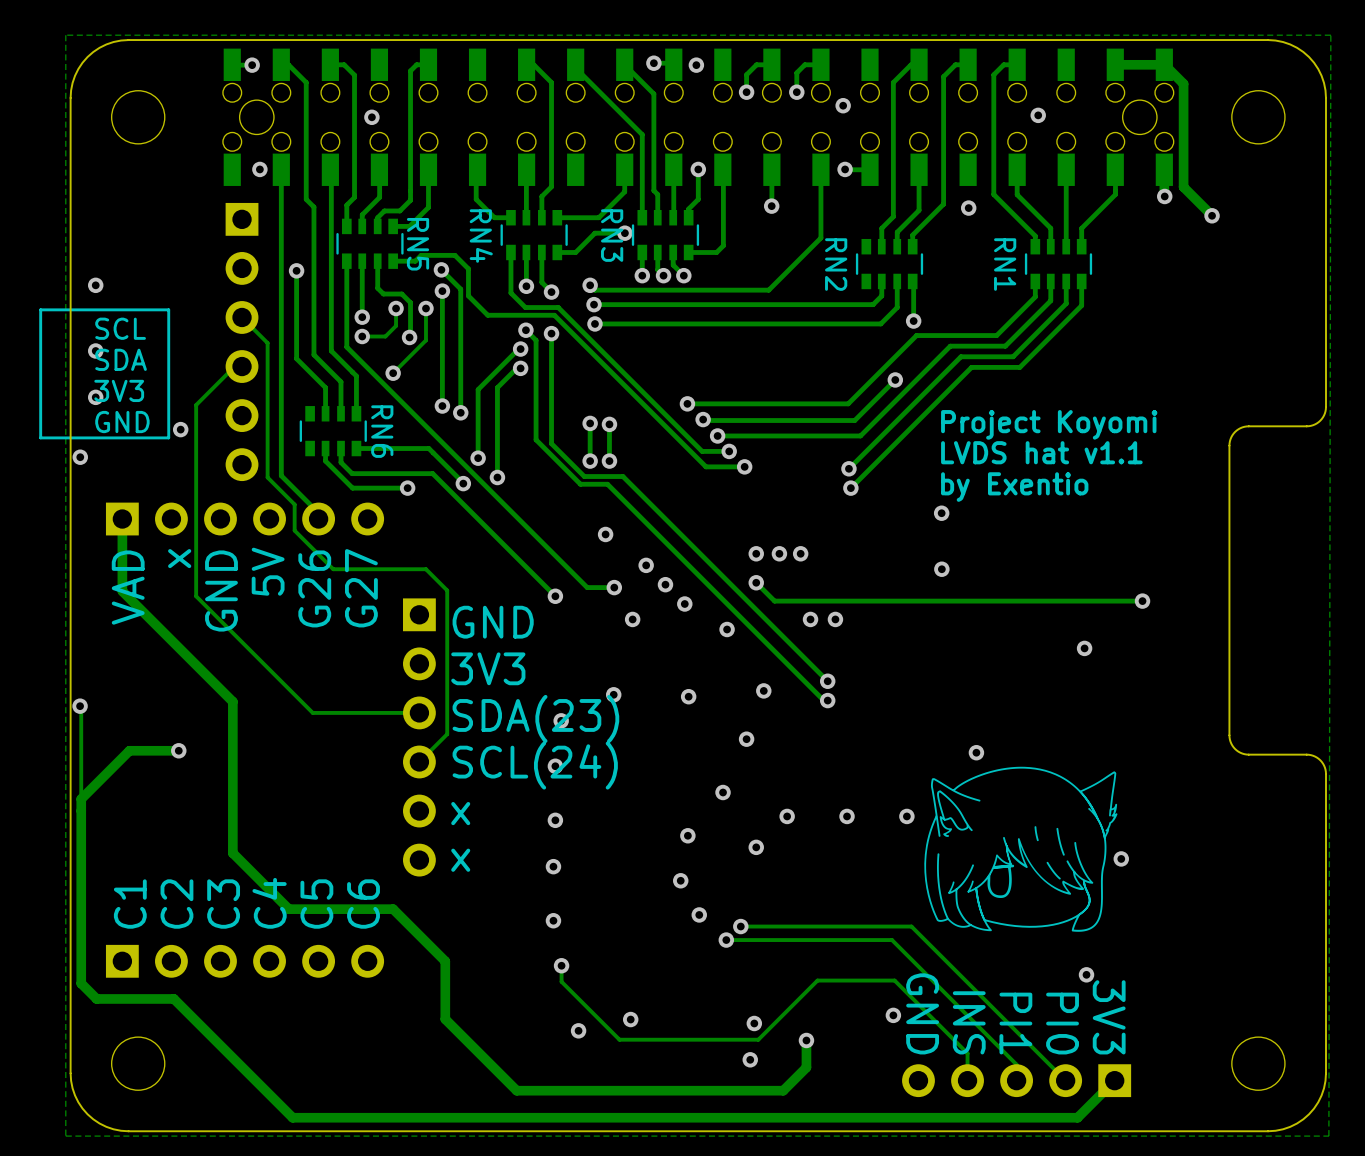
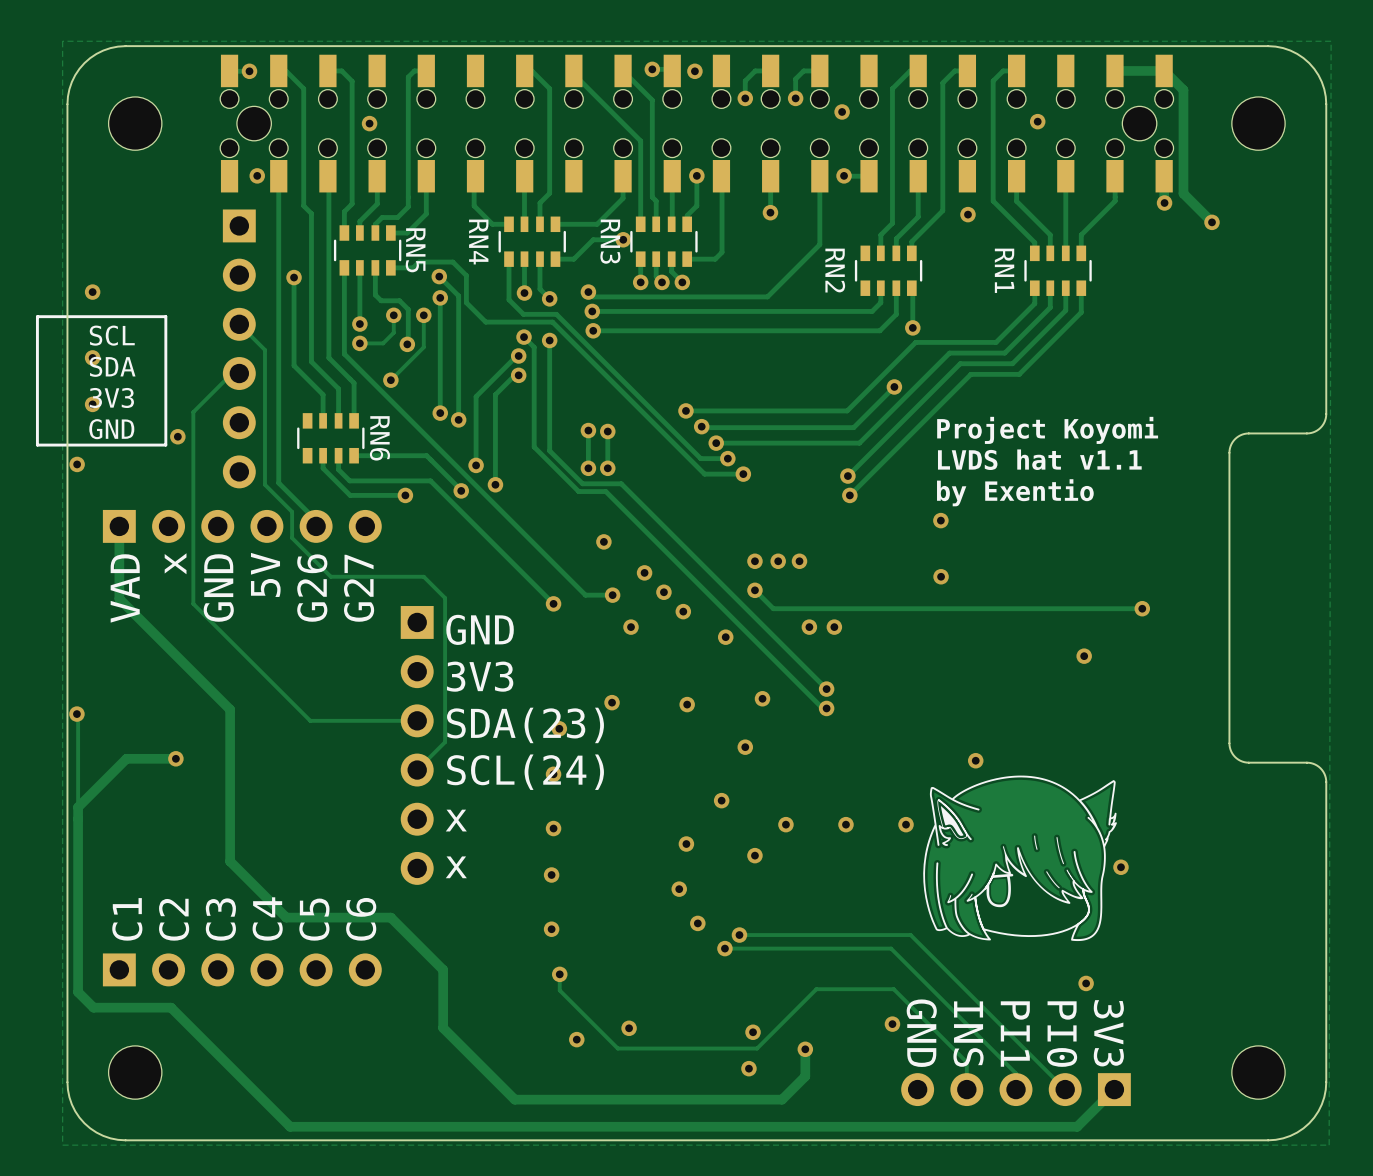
drawing shape: [924, 766, 1118, 932] -> [923, 775, 1117, 942]

